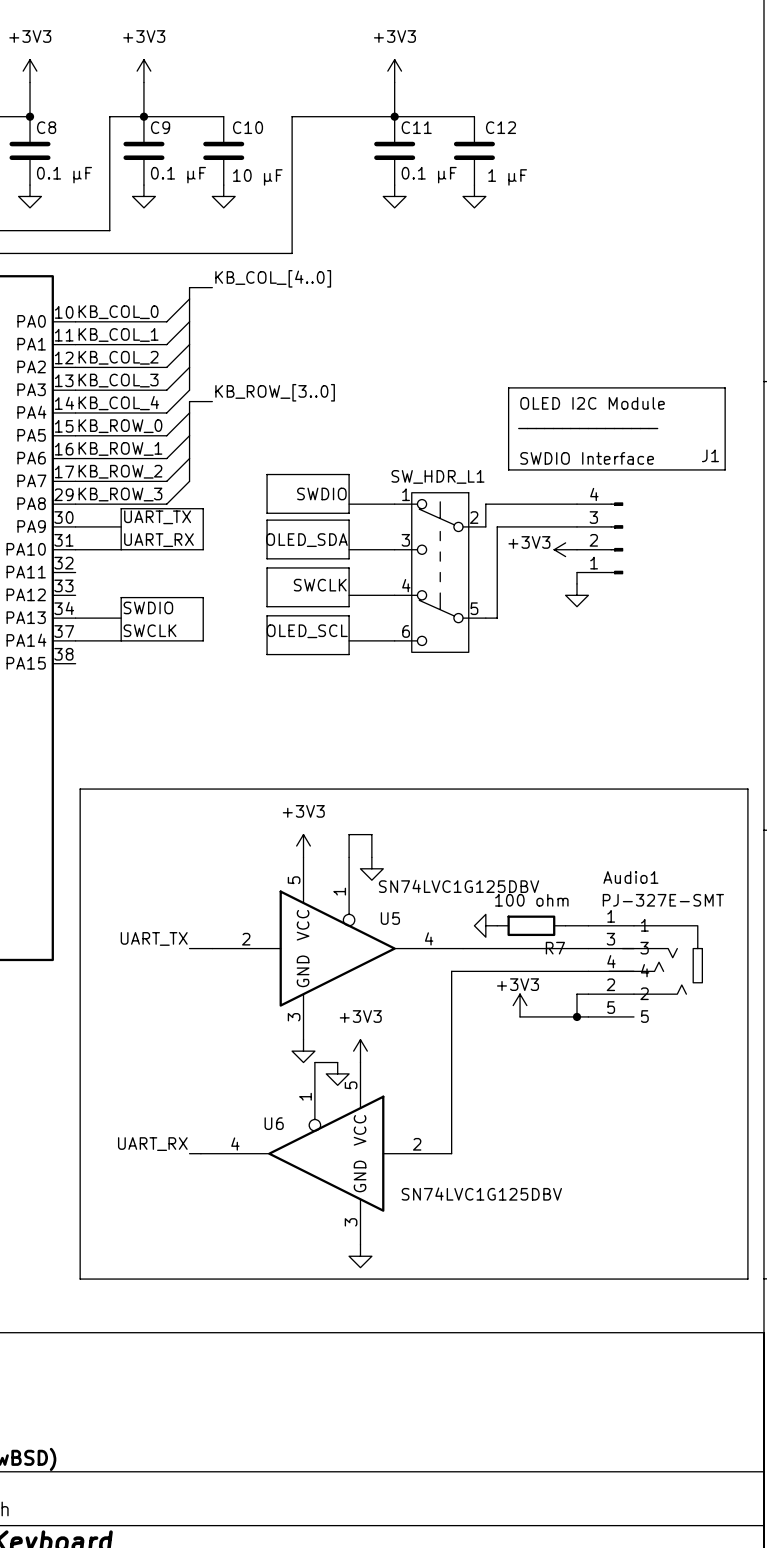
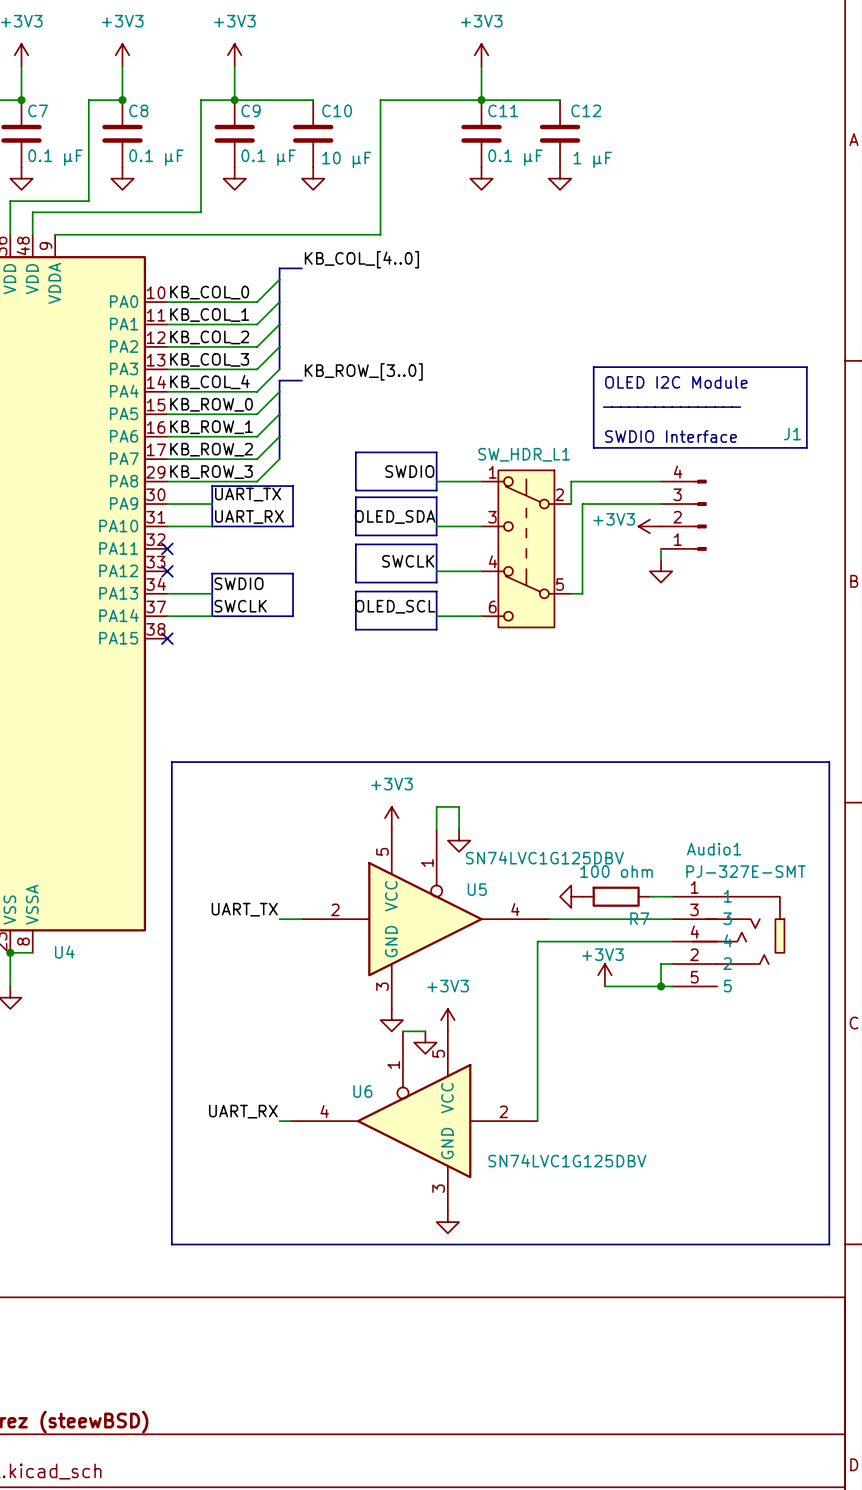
no-connect mark: none -> (167, 548)
no-connect mark: none -> (167, 571)
no-connect mark: none -> (167, 638)

